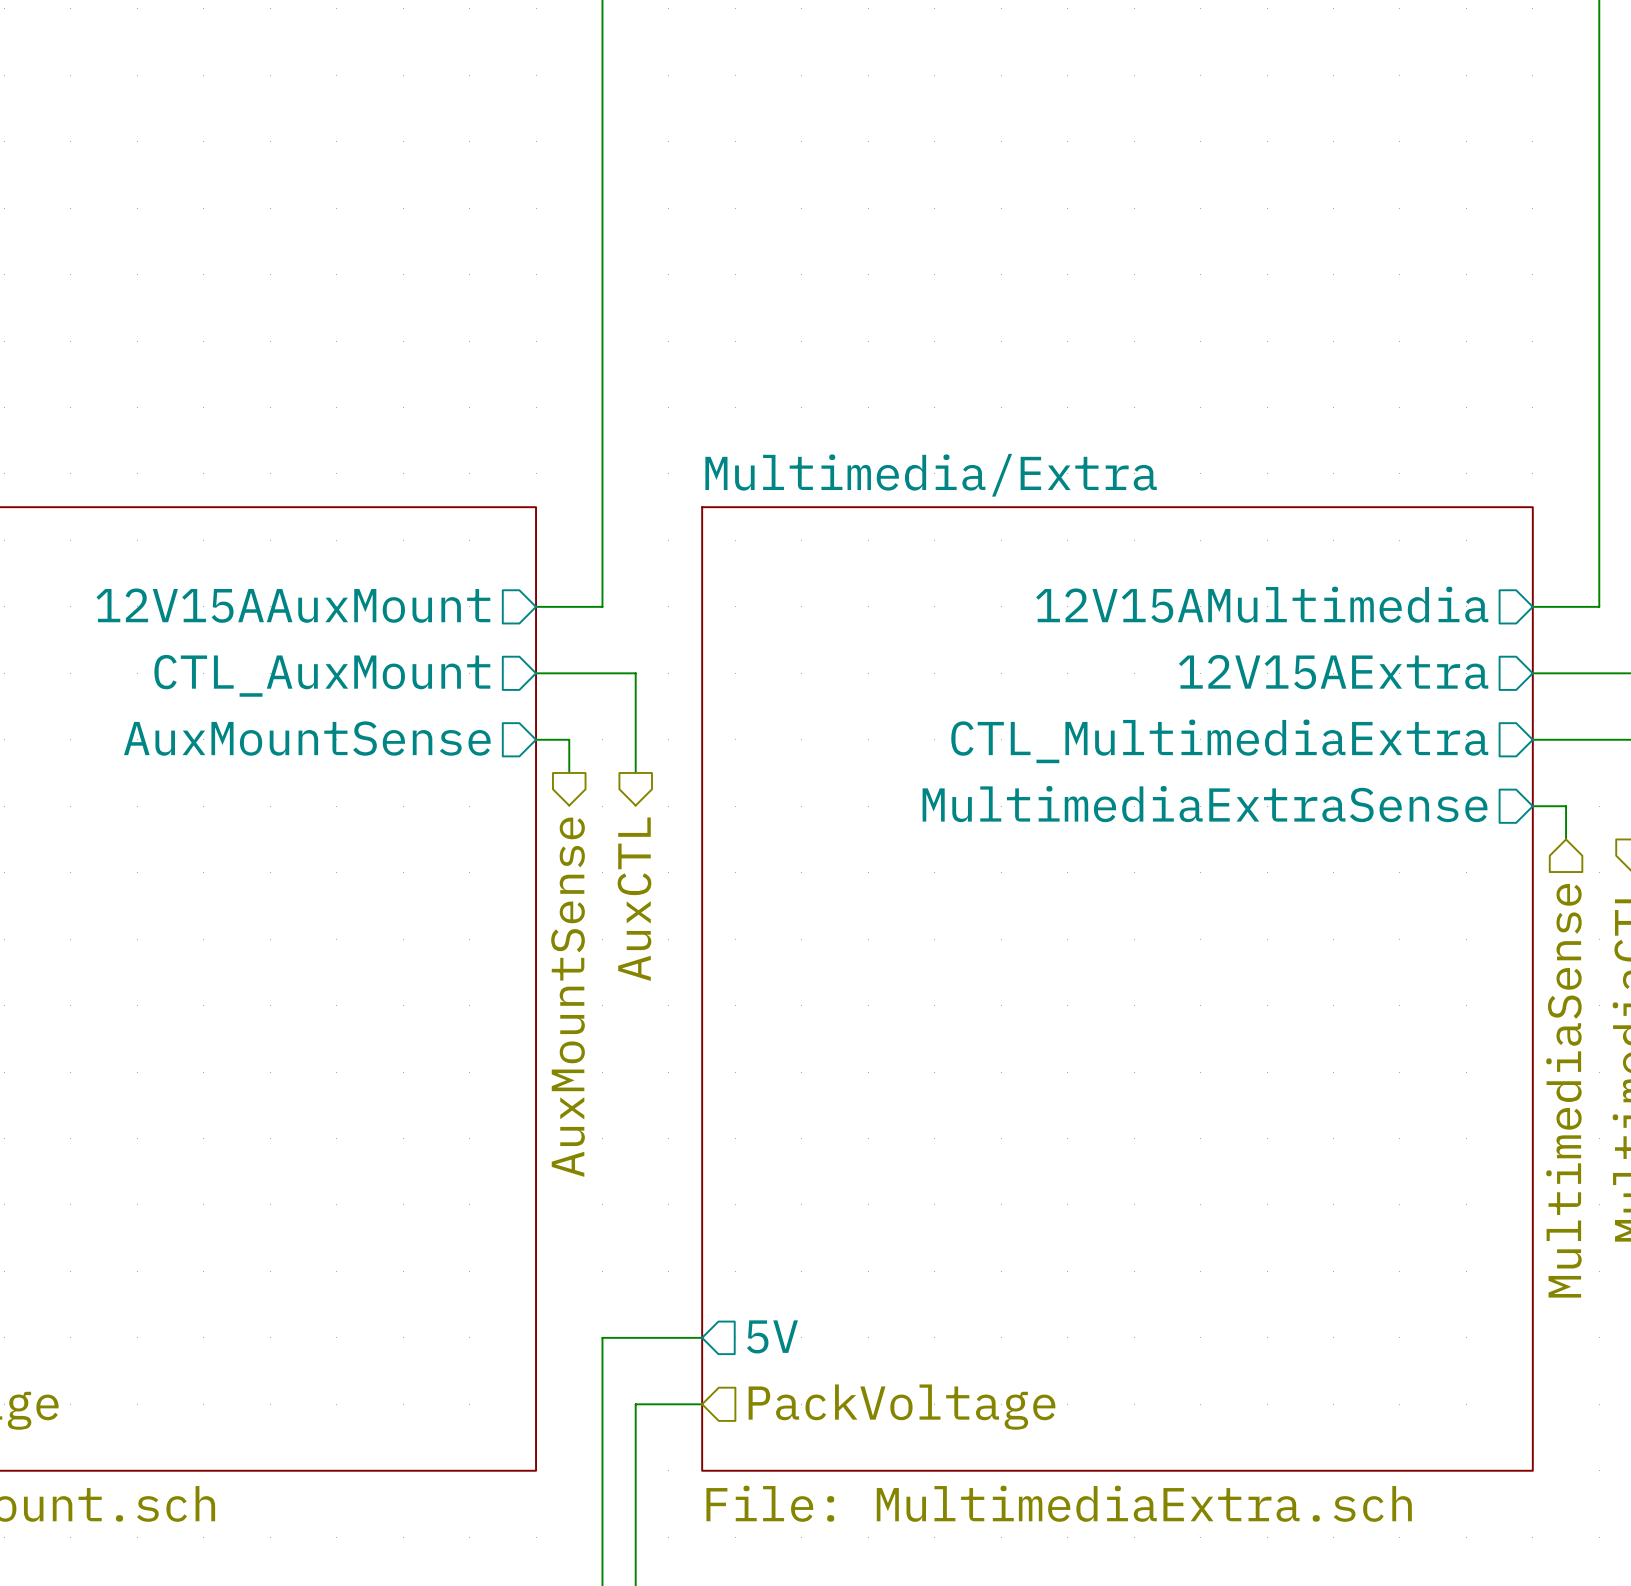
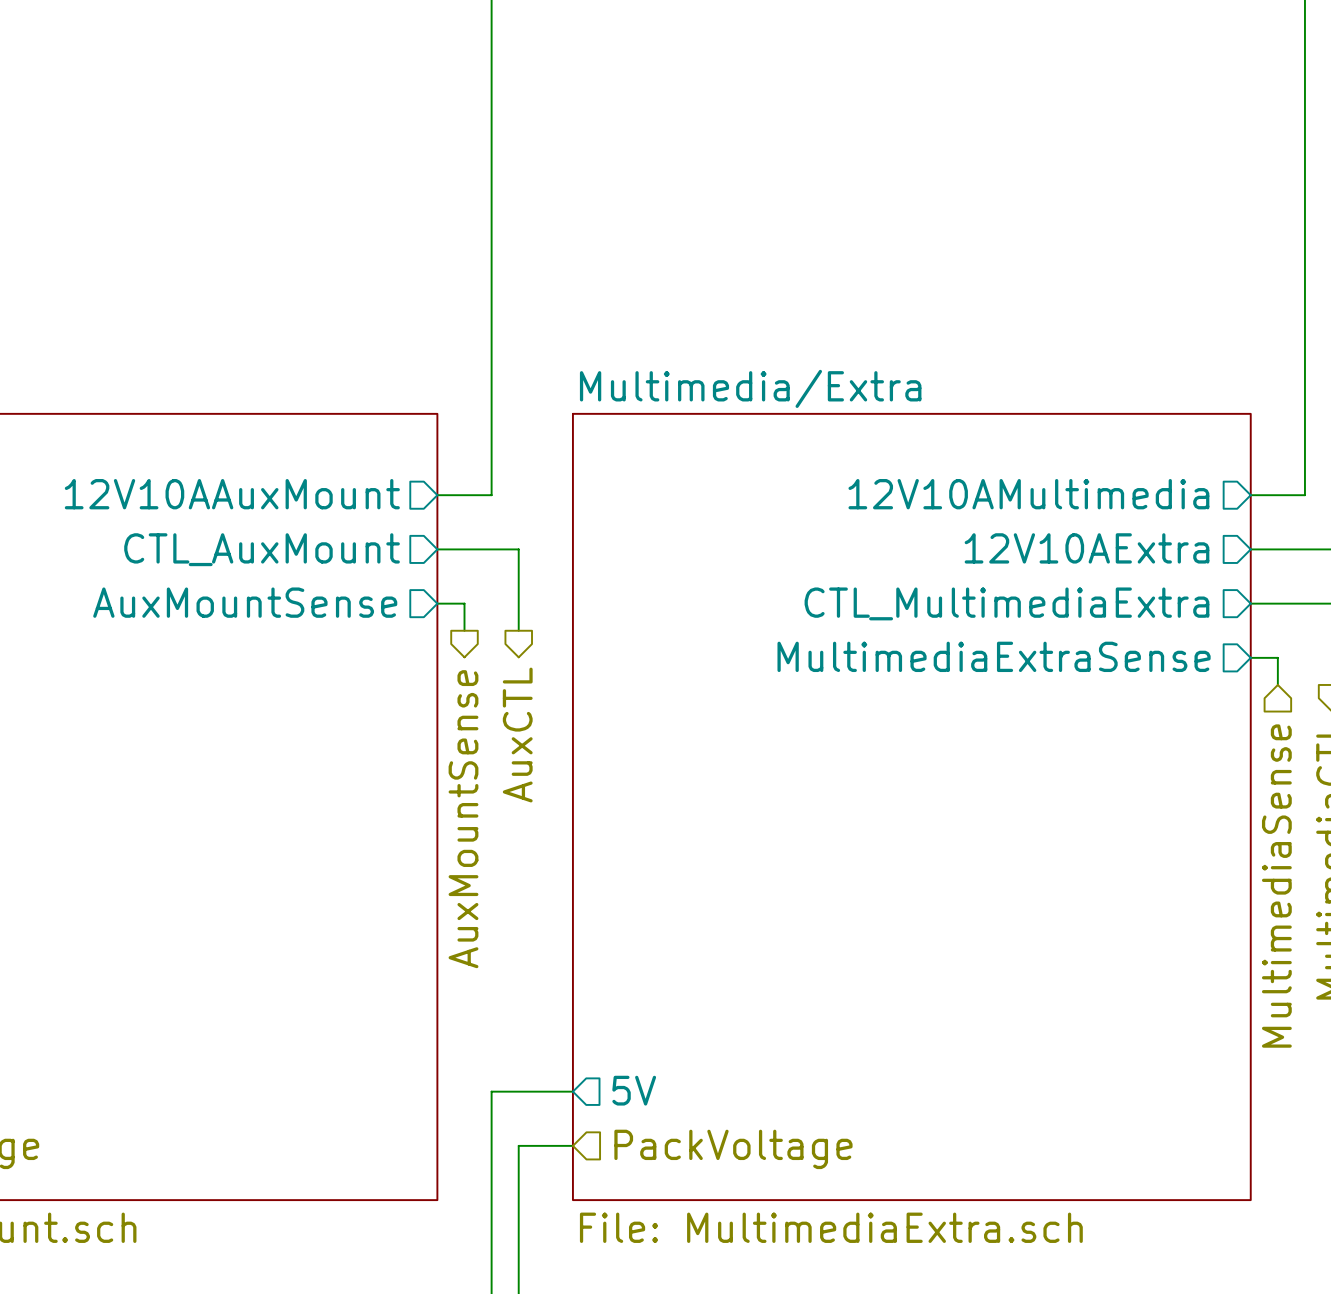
sheet pin: 12V15AMultimedia (1262, 604) -> 12V10AMultimedia (1028, 494)
sheet pin: 12V15AAuxMount (293, 605) -> 12V10AAuxMount (232, 494)
sheet pin: 12V15AExtra (1333, 672) -> 12V10AExtra (1087, 548)

